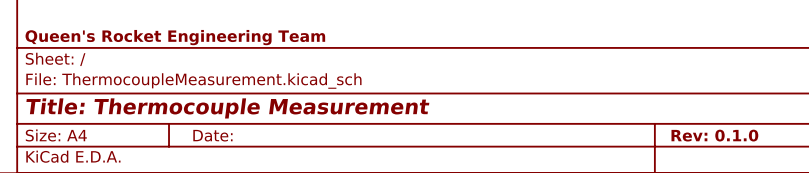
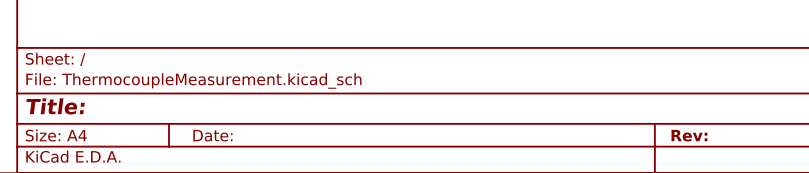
title block: Queen's Rocket Engineering Team (175, 37) -> none
title block: Title: Thermocouple Measurement (227, 108) -> Title: (55, 106)
title block: Rev: 0.1.0 (714, 135) -> Rev: (689, 135)

